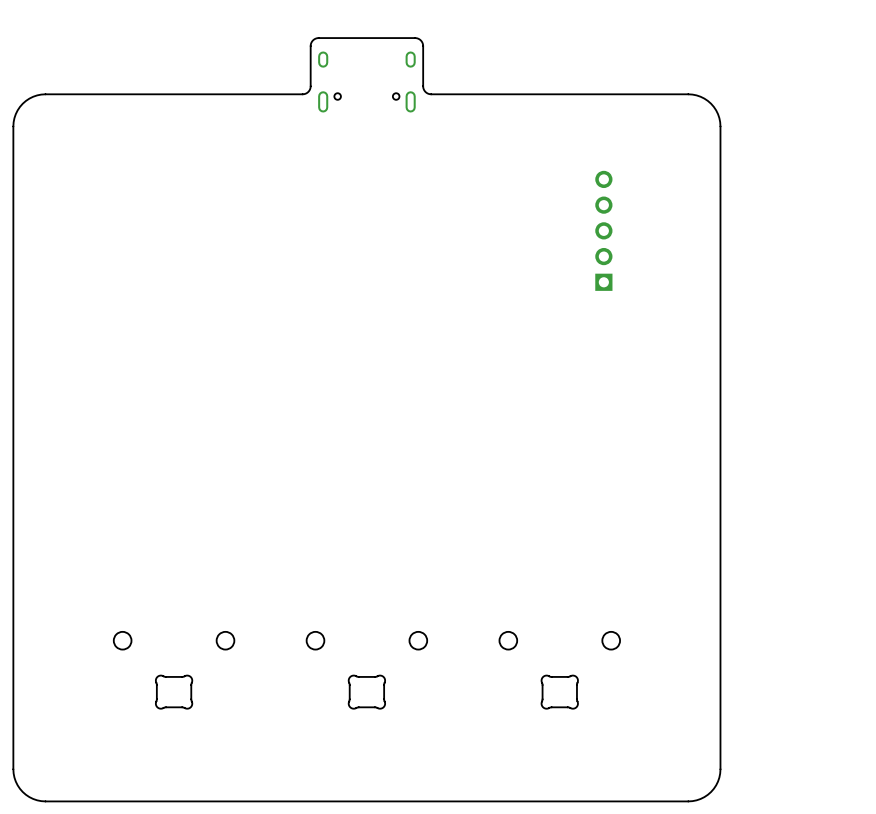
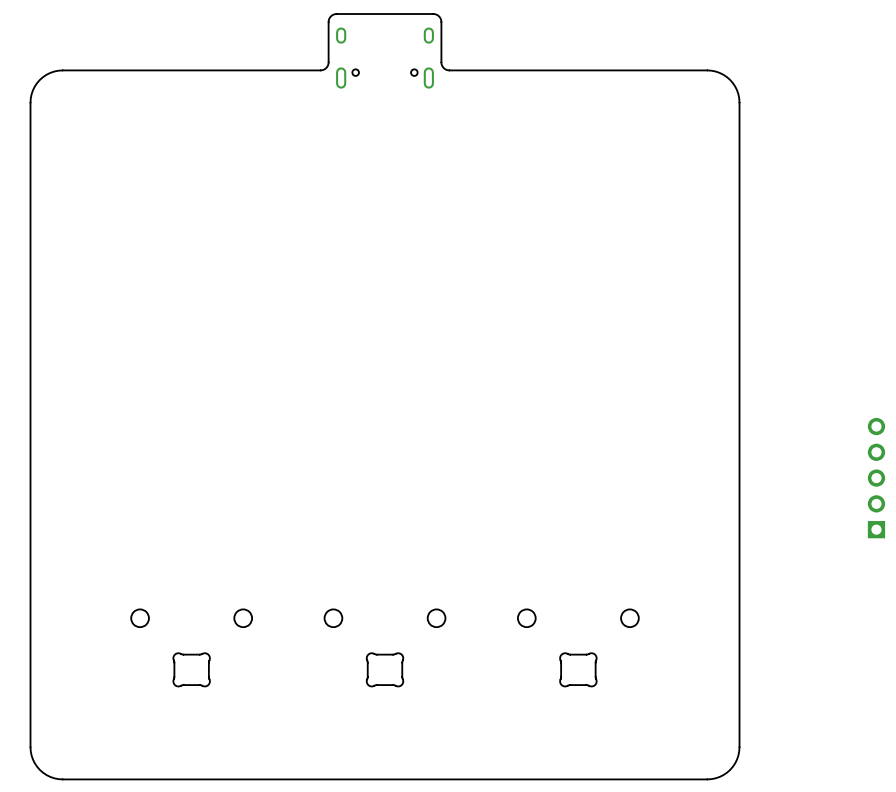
part: (603, 230) -> none
part: none -> (876, 478)

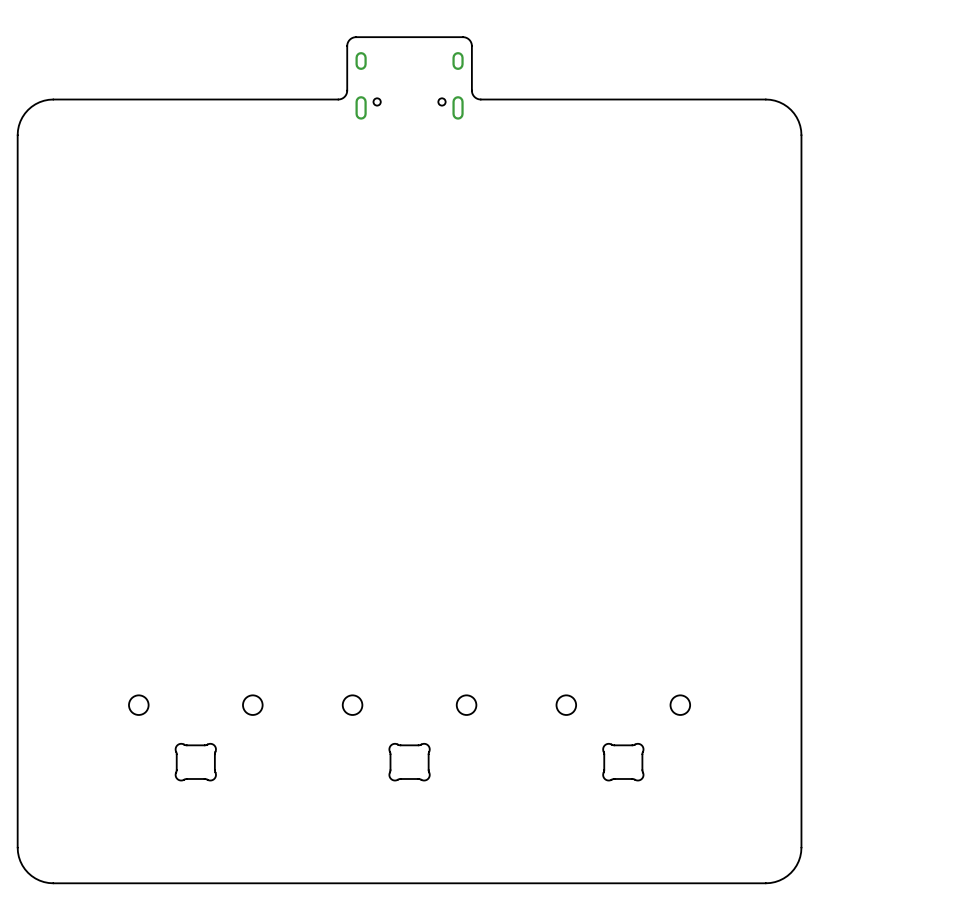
part: (876, 478) -> none

